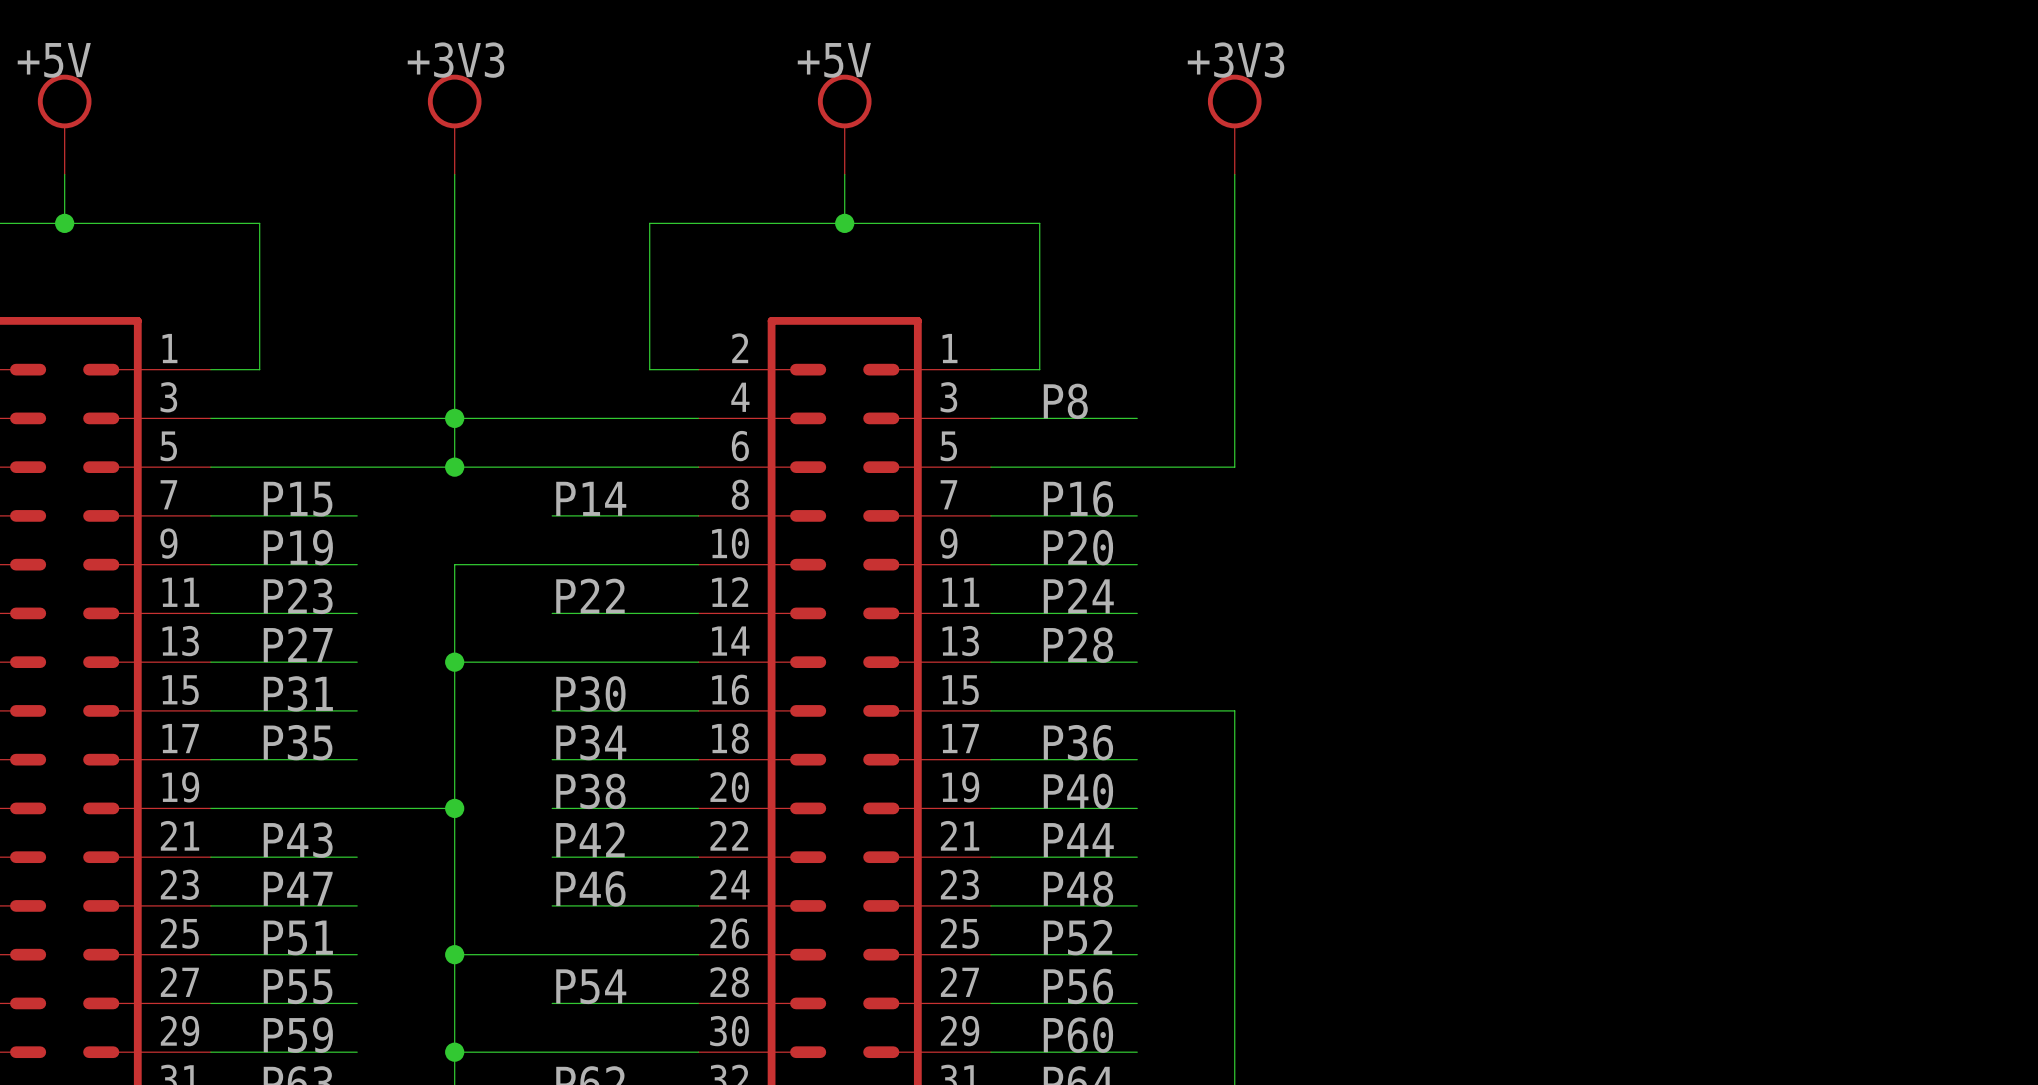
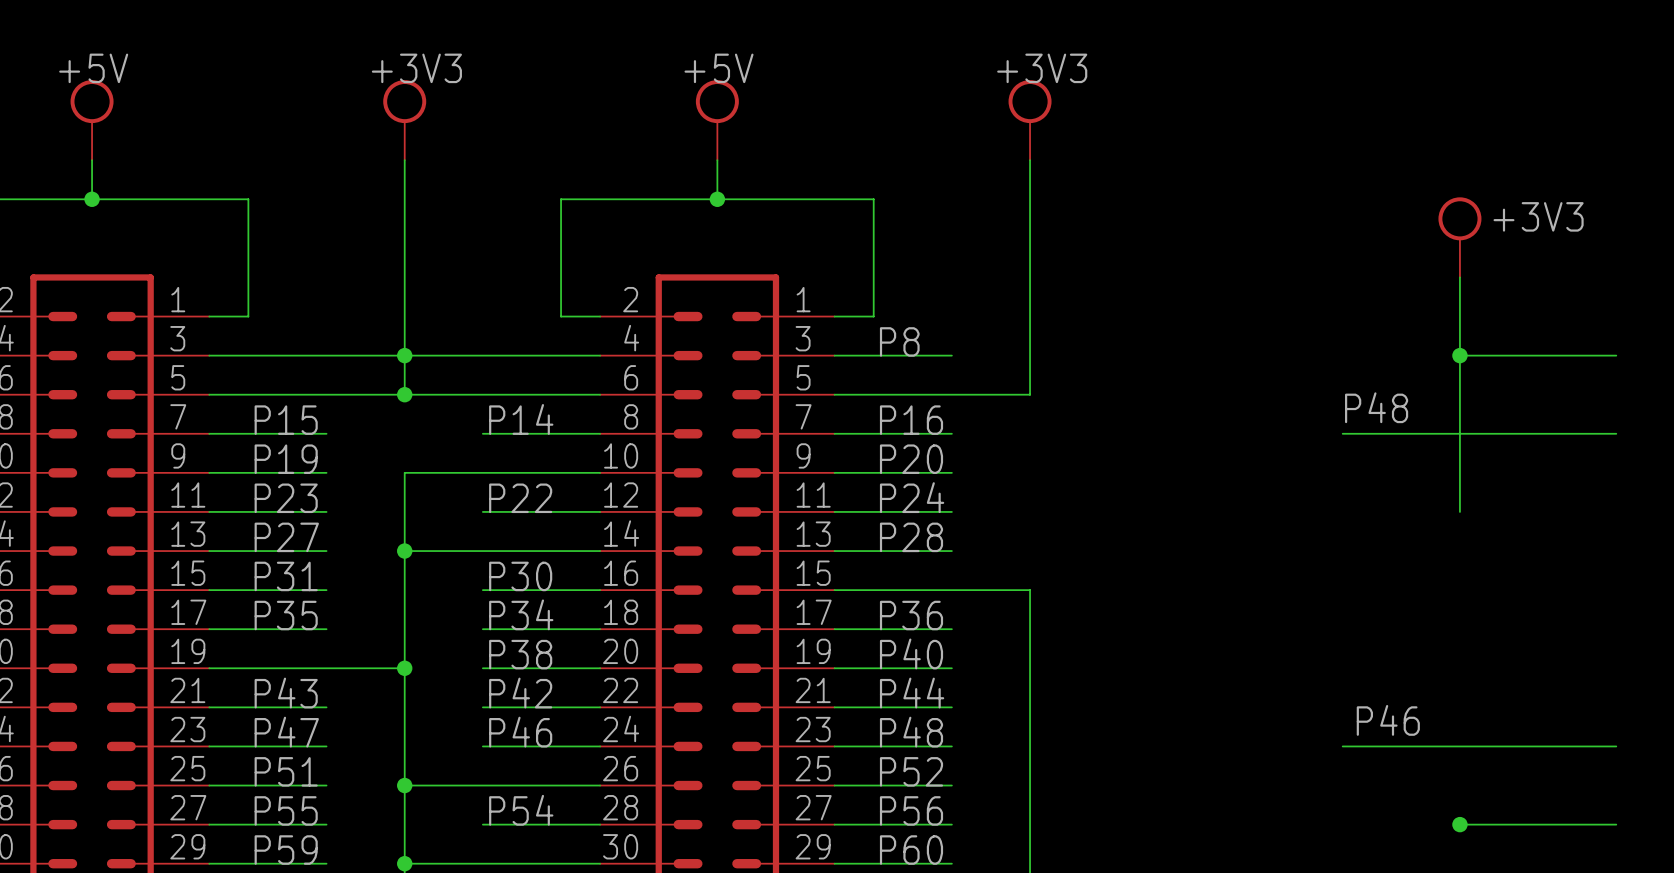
label: none -> +3V3 (1538, 216)
power symbol: none -> (1459, 237)
wire: none -> (1459, 277) (1459, 511)
wire: none -> (1459, 355) (1616, 355)
junction: none -> (1459, 355)
label: none -> P48 (1376, 407)
wire: none -> (1342, 433) (1616, 433)
label: none -> P46 (1388, 720)
wire: none -> (1342, 746) (1616, 746)
wire: none -> (1459, 824) (1616, 824)
junction: none -> (1459, 824)

